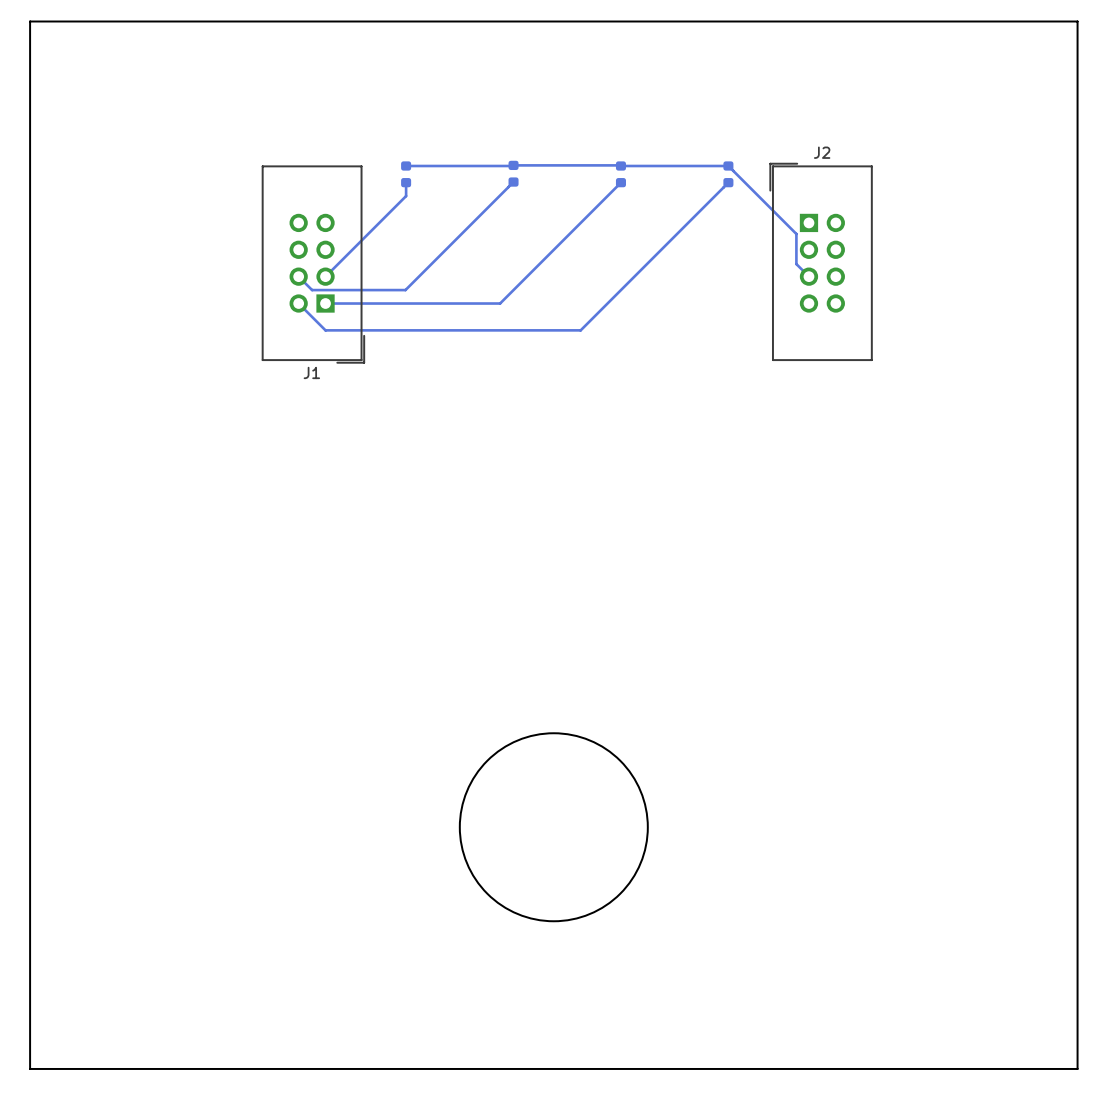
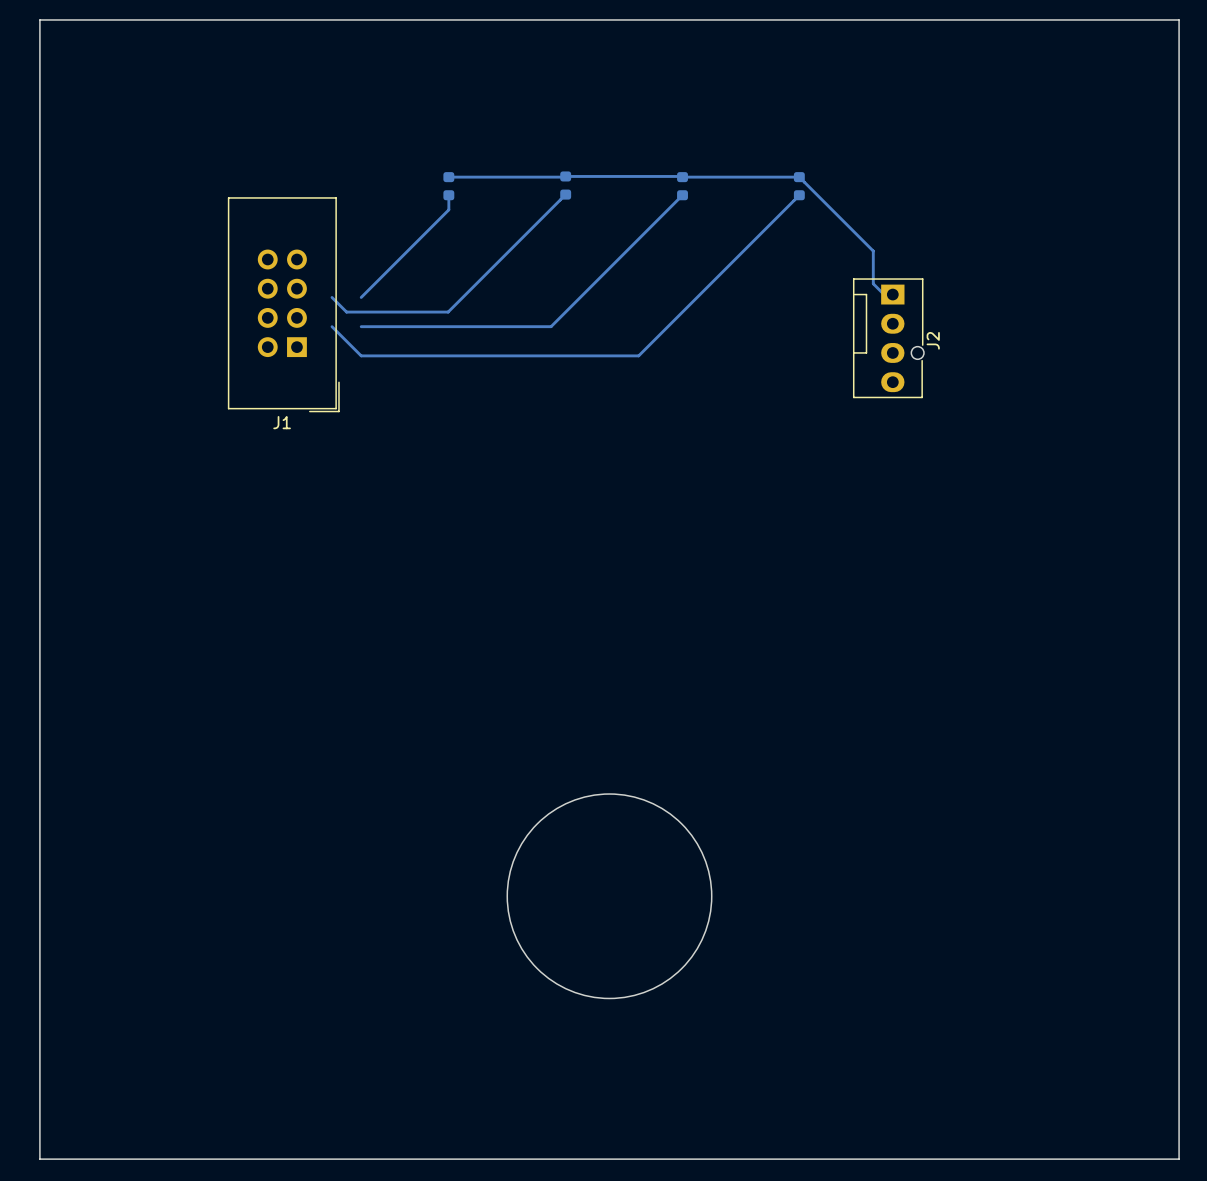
J2 name position: J2 (822, 152) -> J2 (933, 340)
J2 footprint: [769, 163, 873, 361] -> [853, 278, 924, 399]
J1 position: (313, 264) -> (283, 304)

